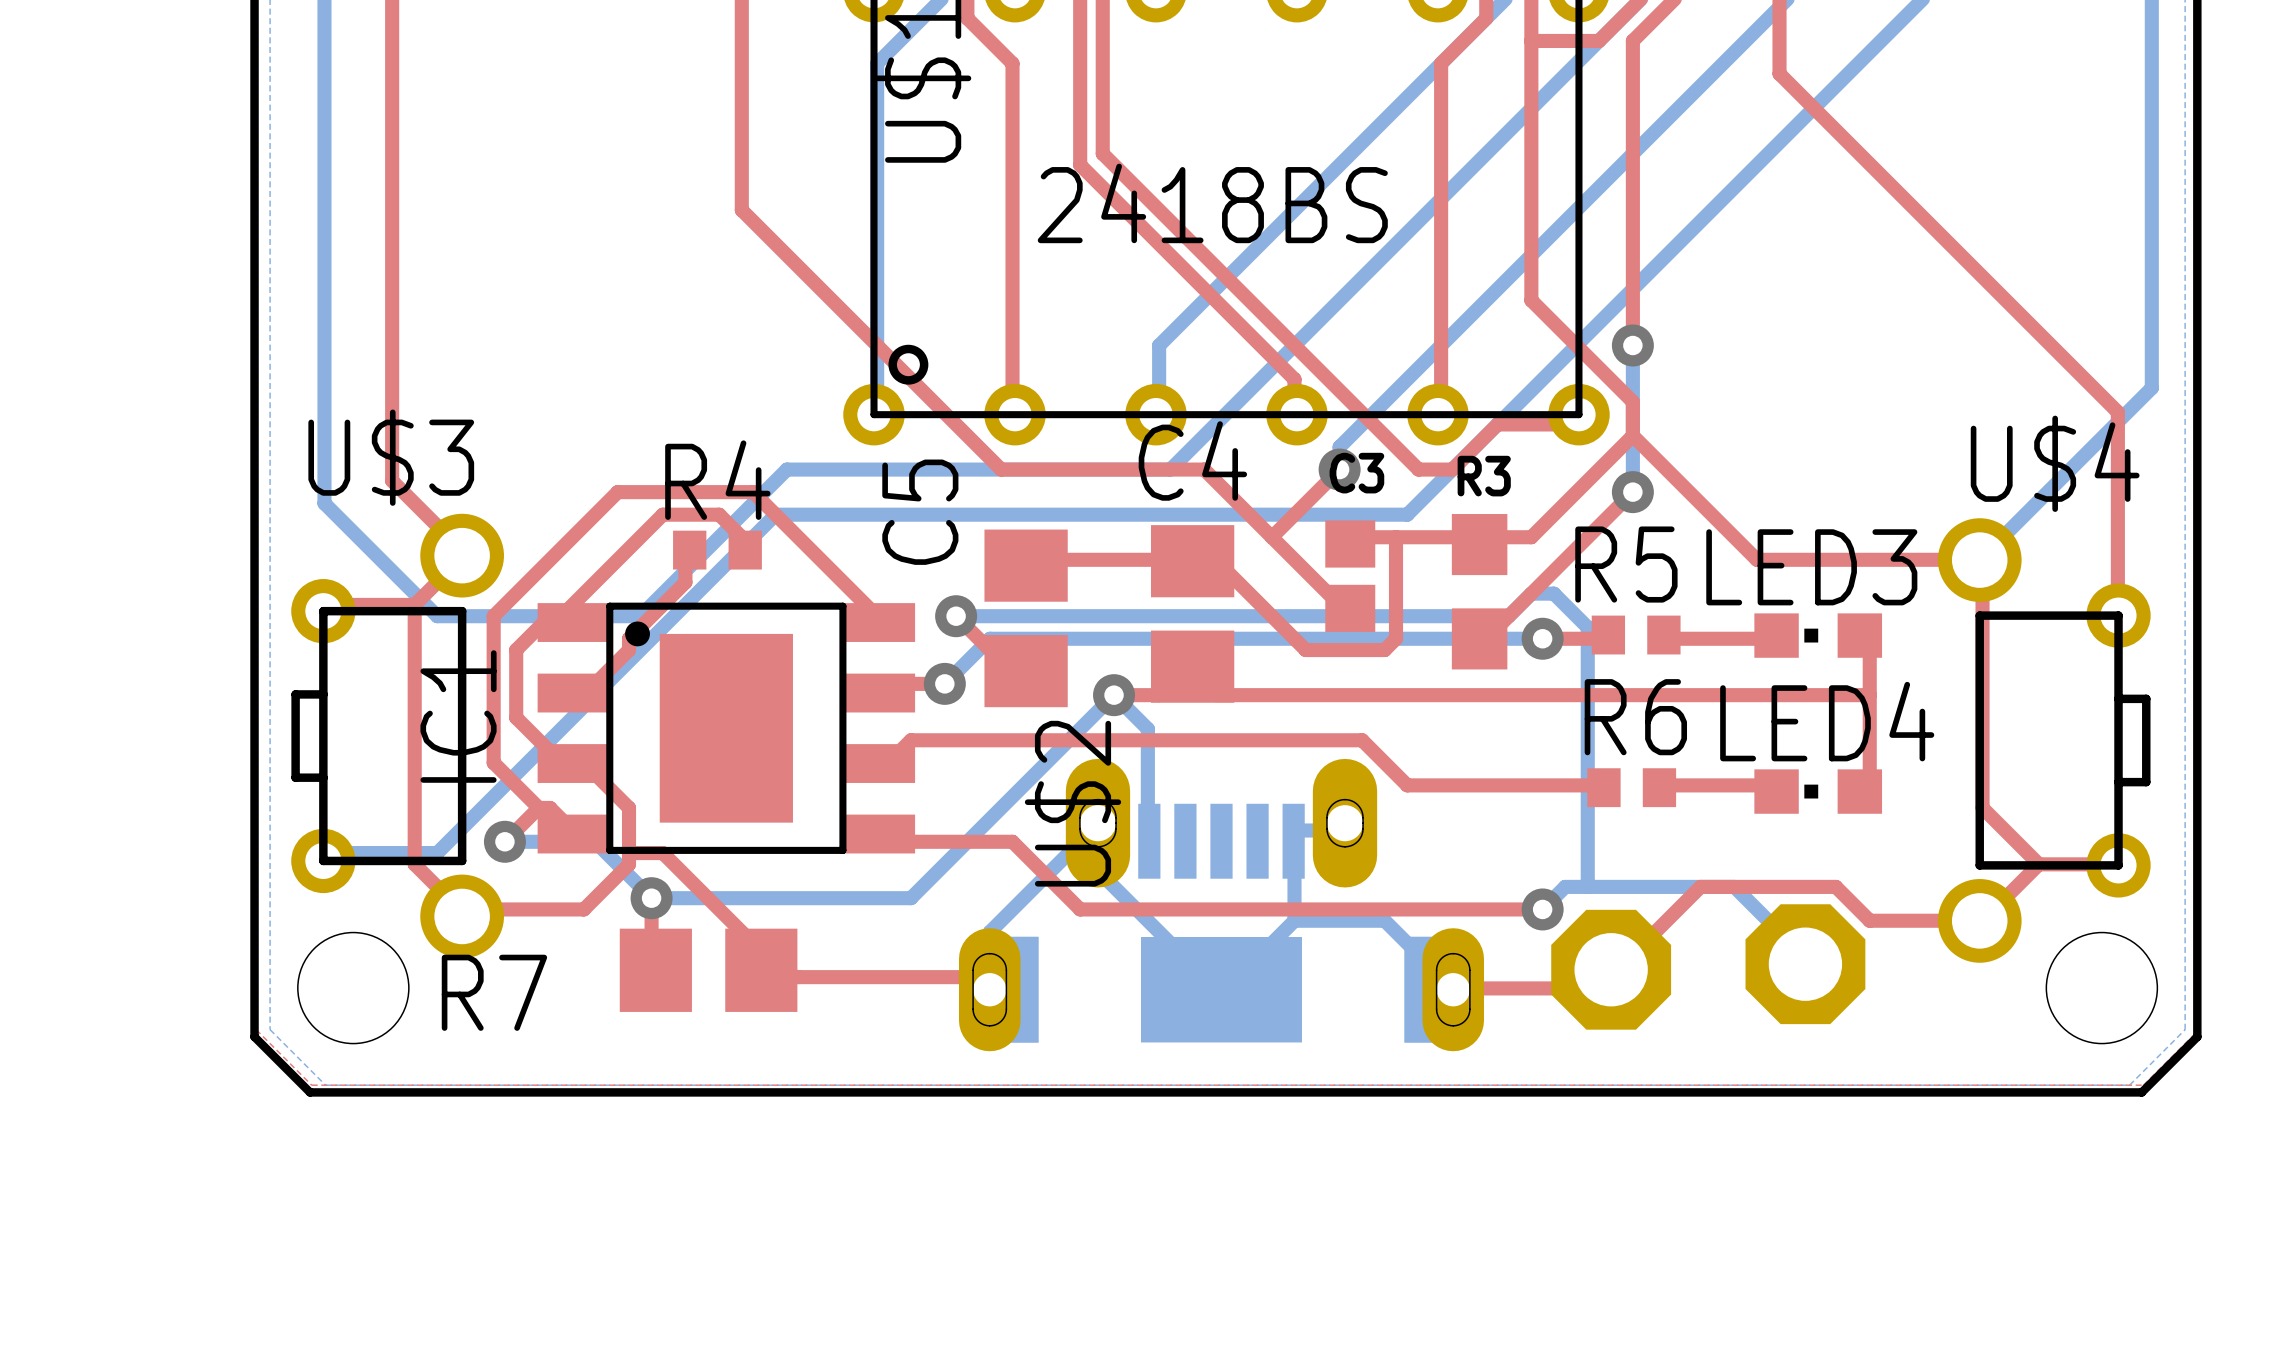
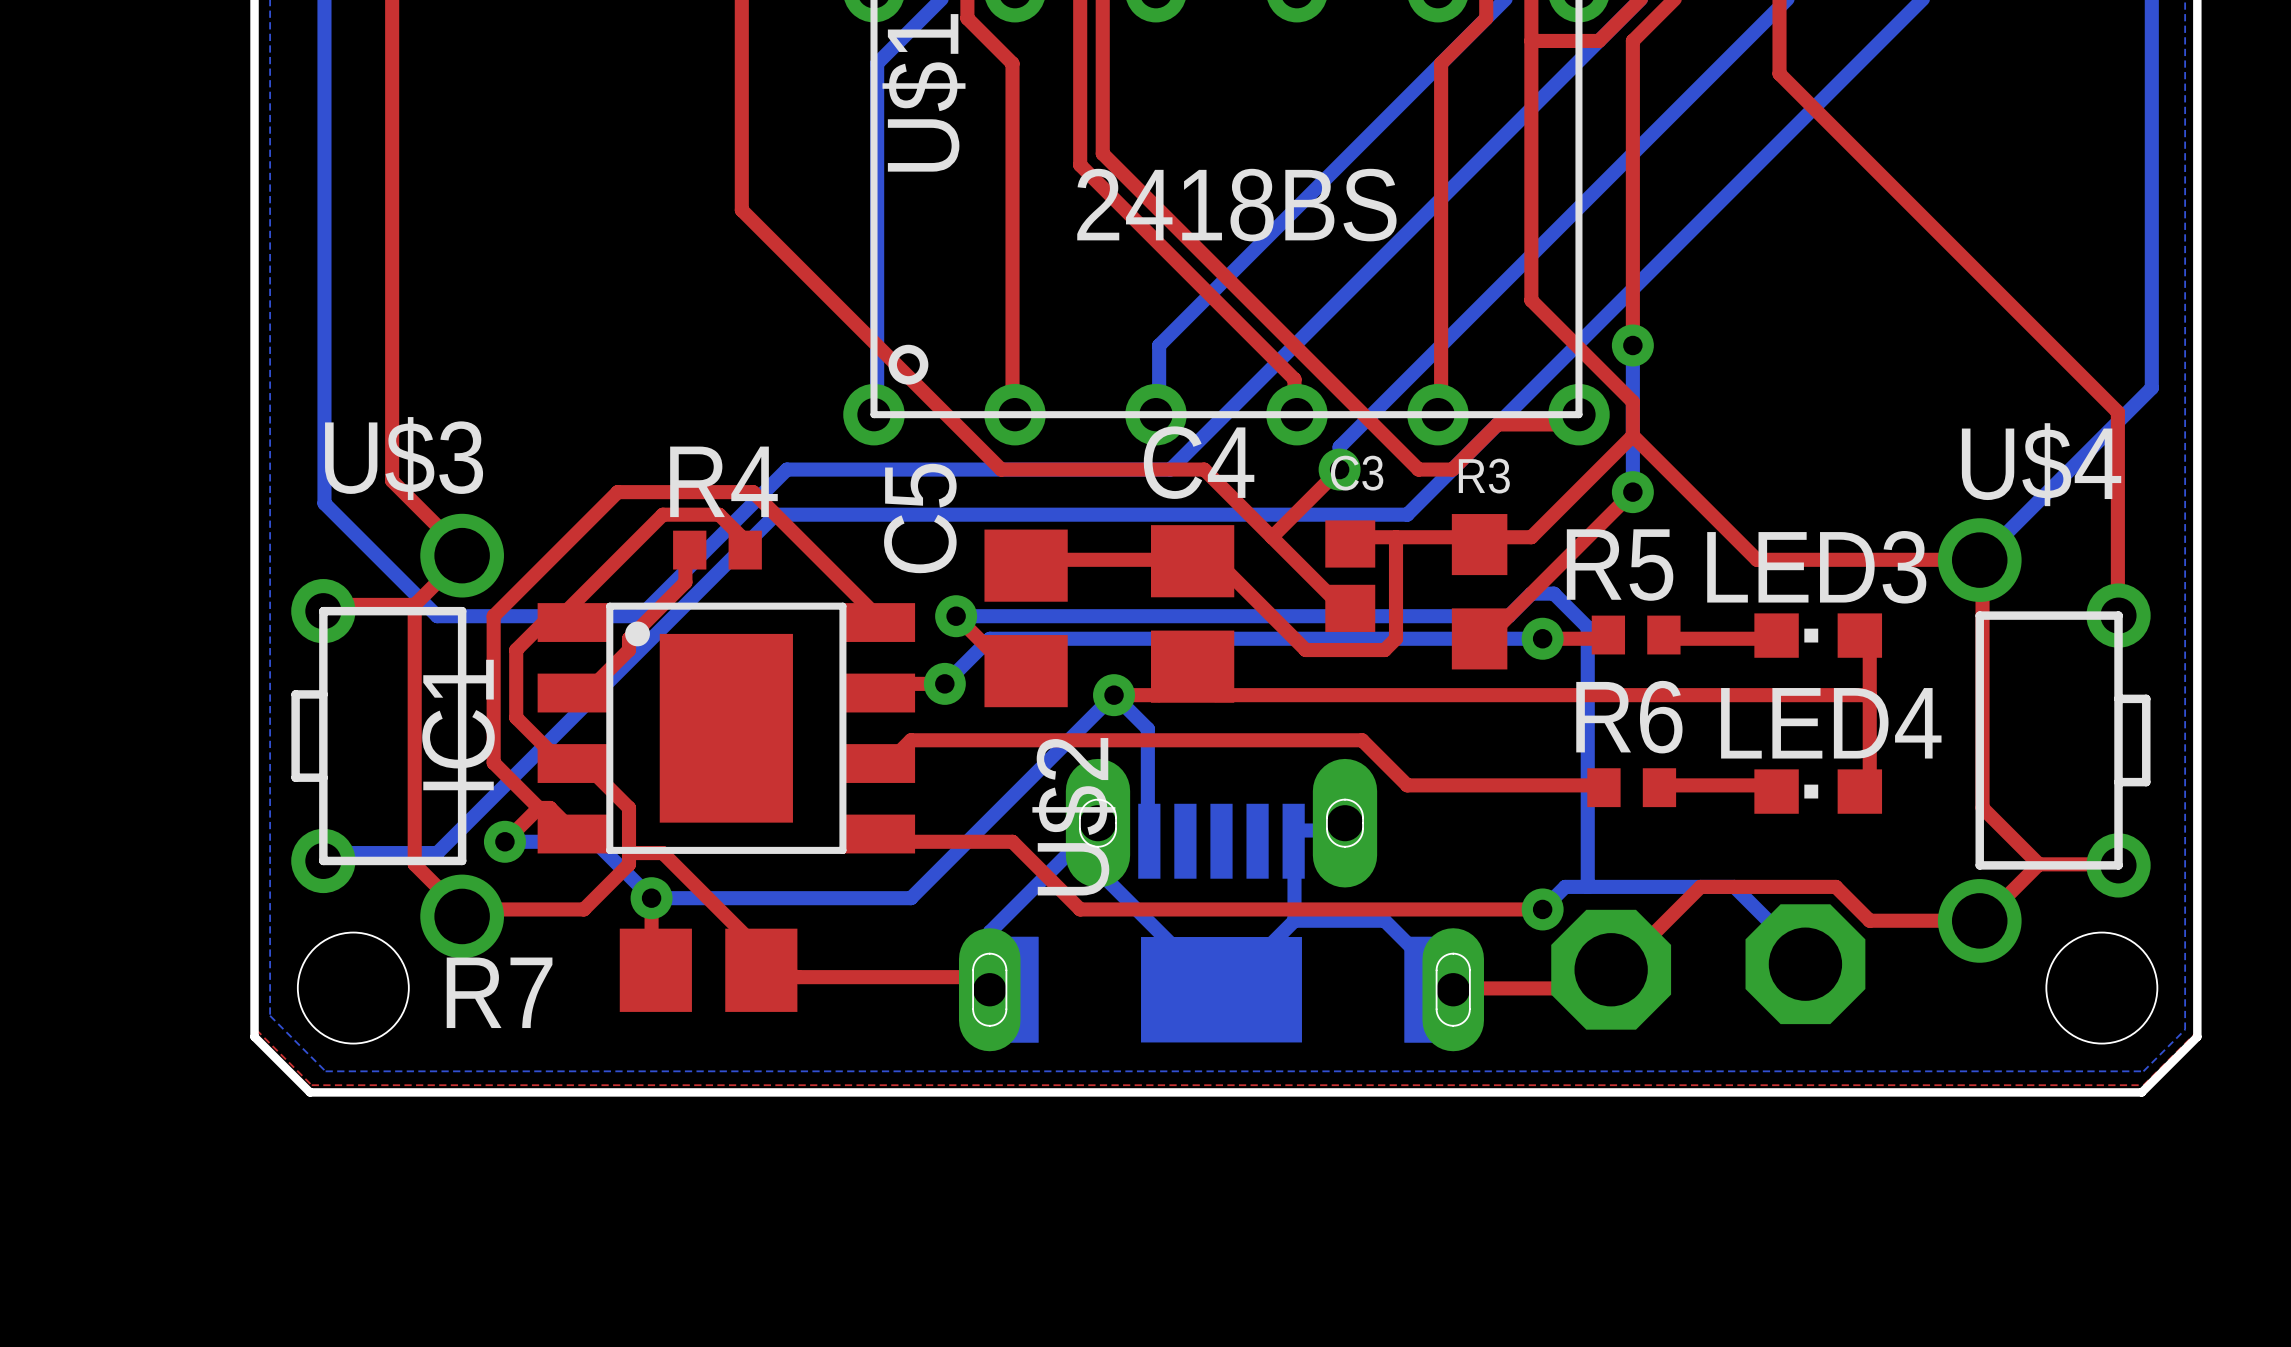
bottom zone outline: (270, 1015) (270, 1029) (325, 1085) (2129, 1085) (2143, 1071) -> (270, 1015) (325, 1071) (2143, 1071)

